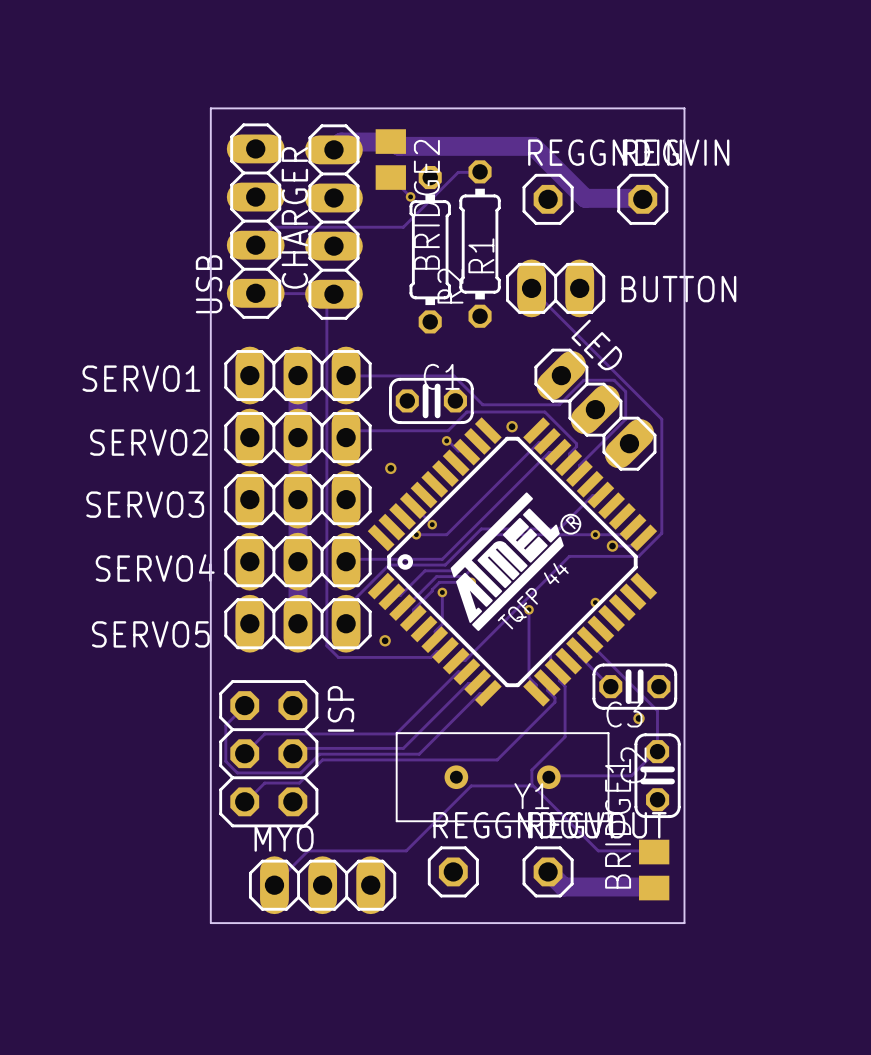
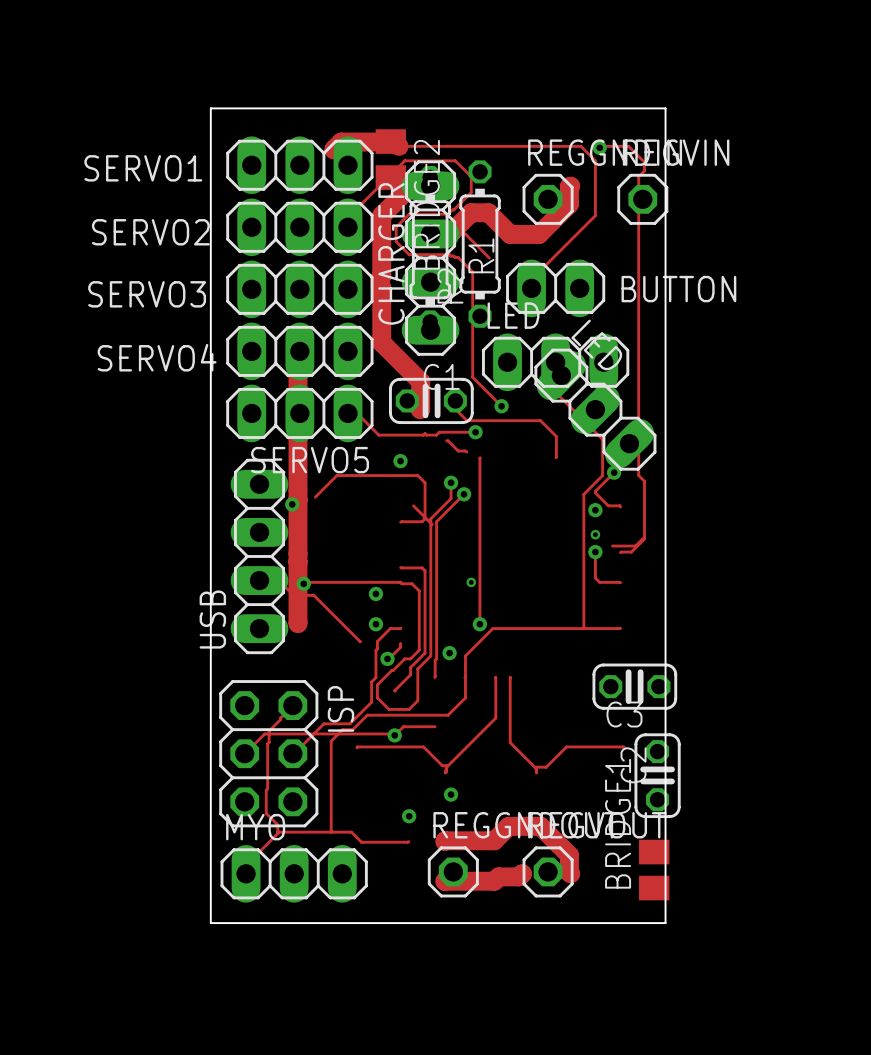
board edge: (665, 108) (684, 108) (684, 923) (665, 923) -> (665, 108) (665, 923)
track width: thick (399, 146) (533, 146) -> thin (399, 146) (533, 146)
track: (533, 146) (585, 198) (642, 199) -> (533, 146) (580, 146) (595, 160) (595, 215) (531, 279) (531, 288)
track: none -> (599, 147) (628, 146) (644, 162) (644, 170) (638, 176) (638, 475) (644, 481) (644, 539) (631, 552) (620, 552)
via: none -> (599, 147)
track: (480, 171) (458, 172) (403, 227) (273, 227) (255, 245) -> none
track: none -> (430, 185) (410, 186) (381, 215) (381, 342) (420, 381) (420, 409)
track: none -> (570, 186) (569, 204) (539, 234) (510, 234) (488, 212) (471, 212) (451, 232) (430, 232) (465, 234) (489, 258)
via: (410, 196) -> none
USB position: (255, 221) -> (259, 556)
CHARGER position: (333, 222) -> (430, 258)
track: none -> (347, 227) (348, 217) (404, 160) (455, 160) (471, 176) (471, 192) (453, 209) (448, 214) (409, 214) (396, 227) (396, 241) (409, 254) (449, 254) (458, 257) (472, 271) (472, 377) (501, 406)
track: (531, 288) (661, 419) (661, 533) (638, 556) (569, 556) (465, 660) (456, 661) -> none
track: (255, 293) (321, 293) (326, 299) (333, 294) (326, 300) (326, 645) (338, 657) (430, 657) (436, 651) (445, 650) -> none
track: none -> (555, 362) (556, 390) (559, 396) (602, 439) (602, 475) (583, 494) (583, 628)
LED: none -> (555, 362)
SERVO1 position: (297, 375) -> (299, 165)
track: (346, 375) (453, 375) (482, 404) (559, 404) (583, 380) (614, 380) (625, 391) (625, 419) (579, 465) (579, 473) -> none
via: none -> (501, 406)
track: none -> (456, 409) (466, 420) (540, 420) (556, 436) (556, 457)
track: none -> (347, 413) (357, 413) (378, 435) (436, 435) (439, 432) (475, 432)
via: (512, 426) -> none
via: none -> (475, 432)
SERVO2 position: (297, 437) -> (299, 227)
track: (346, 437) (352, 430) (448, 430) (466, 412) (544, 412) (576, 443) (576, 446) (569, 453) (568, 462) -> none
via: (446, 440) -> none
track: (547, 441) (539, 442) (446, 534) (416, 534) -> none
track: (557, 452) (549, 452) (442, 559) (348, 559) (346, 561) -> none
track: none -> (480, 457) (479, 624)
via position: (390, 468) -> (400, 461)
track: none -> (614, 472) (595, 492) (608, 505) (620, 507)
via: none -> (614, 472)
track: none -> (451, 482) (451, 498) (430, 518) (430, 656) (417, 669) (417, 700) (409, 709) (388, 709) (377, 697) (377, 684) (404, 658) (410, 658) (419, 650) (419, 591) (412, 583) (400, 582) (303, 583)
via: none -> (451, 482)
track: none -> (464, 494) (436, 521) (436, 658) (434, 677)
via: none -> (464, 494)
track: (600, 494) (592, 495) (559, 528) (481, 528) (445, 565) (388, 565) (347, 606) (346, 623) -> none
track: none -> (315, 497) (336, 475) (417, 475) (425, 482) (425, 518) (422, 521) (400, 522)
SERVO3 position: (297, 499) -> (299, 289)
via: none -> (292, 504)
via: none -> (595, 510)
via: (432, 524) -> none
track: (633, 527) (625, 534) (492, 534) (456, 570) (425, 570) (400, 595) (391, 596) -> none
via: (416, 534) -> none
via: (612, 546) -> none
track: none -> (595, 552) (595, 578) (599, 582) (620, 582)
via: none -> (595, 552)
SERVO4 position: (297, 561) -> (299, 351)
part: (512, 561) -> none
track: none -> (400, 567) (422, 567) (425, 570) (425, 653) (410, 667) (410, 674) (395, 691)
track: (472, 567) (464, 576) (436, 576) (406, 606) (402, 607) -> none
track: none -> (259, 580) (279, 580) (293, 595) (313, 595) (360, 641)
track: (471, 582) (439, 582) (413, 609) (413, 618) -> none
via: none -> (303, 583)
track: (442, 592) (442, 624) (435, 631) (434, 639) -> none
via: (442, 592) -> none
via: none -> (375, 593)
track: (595, 602) (595, 606) (550, 651) (550, 663) (559, 671) (559, 680) (565, 686) (565, 736) (531, 770) (531, 784) (598, 850) (654, 852) -> none
via: (595, 602) -> none
track: (528, 609) (528, 677) (536, 684) (536, 693) -> none
via: (528, 609) -> none
SERVO5 position: (297, 623) -> (299, 413)
via: none -> (375, 624)
via: none -> (479, 624)
track: none -> (620, 628) (492, 628) (465, 656) (465, 697) (448, 715) (367, 715) (352, 729) (342, 729) (331, 741) (331, 832)
SERVO5 name position: SERVO5 (150, 634) -> SERVO5 (310, 460)
track: (590, 639) (591, 644) (657, 710) (657, 751) -> none
via: (385, 640) -> none
track: none -> (400, 643) (400, 647) (387, 658)
track: (579, 650) (579, 656) (610, 686) -> none
via: none -> (449, 653)
via: none -> (387, 658)
track: (466, 671) (458, 671) (403, 726) -> (435, 726) (403, 726)
track: none -> (495, 677) (495, 718) (446, 767) (445, 772) (446, 765) (442, 765) (423, 746) (357, 747)
track: none -> (510, 677) (510, 742) (536, 768) (536, 772) (536, 767) (546, 767) (566, 746) (624, 747)
track: (477, 682) (468, 683) (403, 748) (297, 748) (292, 753) -> (400, 628) (390, 628) (377, 641) (375, 677) (371, 681) (371, 702) (349, 723) (323, 723) (292, 753)
track: (547, 682) (547, 690) (554, 697) (554, 702) (497, 759) (322, 759) (299, 783) (264, 783) (244, 801) -> none
track: (488, 693) (479, 693) (419, 754) (319, 754) (300, 772) (237, 772) (225, 761) (225, 725) (244, 705) -> none
track: none -> (292, 705) (269, 731) (266, 813) (277, 824) (278, 832)
via: (639, 718) -> none
via: none -> (394, 735)
track: (657, 751) (631, 775) (548, 777) -> none
Y1: (502, 777) -> none
track: (532, 785) (471, 785) (406, 850) (308, 850) (274, 885) -> none
via: none -> (451, 794)
via: none -> (409, 816)
track: none -> (408, 841) (361, 842) (351, 832) (279, 832) (247, 863) (246, 873)
track: none -> (444, 841) (494, 840) (508, 826) (540, 826) (569, 855) (570, 873)
track: (548, 871) (563, 887) (654, 888) -> none
track: none -> (522, 873) (518, 876) (498, 876) (494, 881) (444, 881)
MYO position: (322, 885) -> (294, 873)

